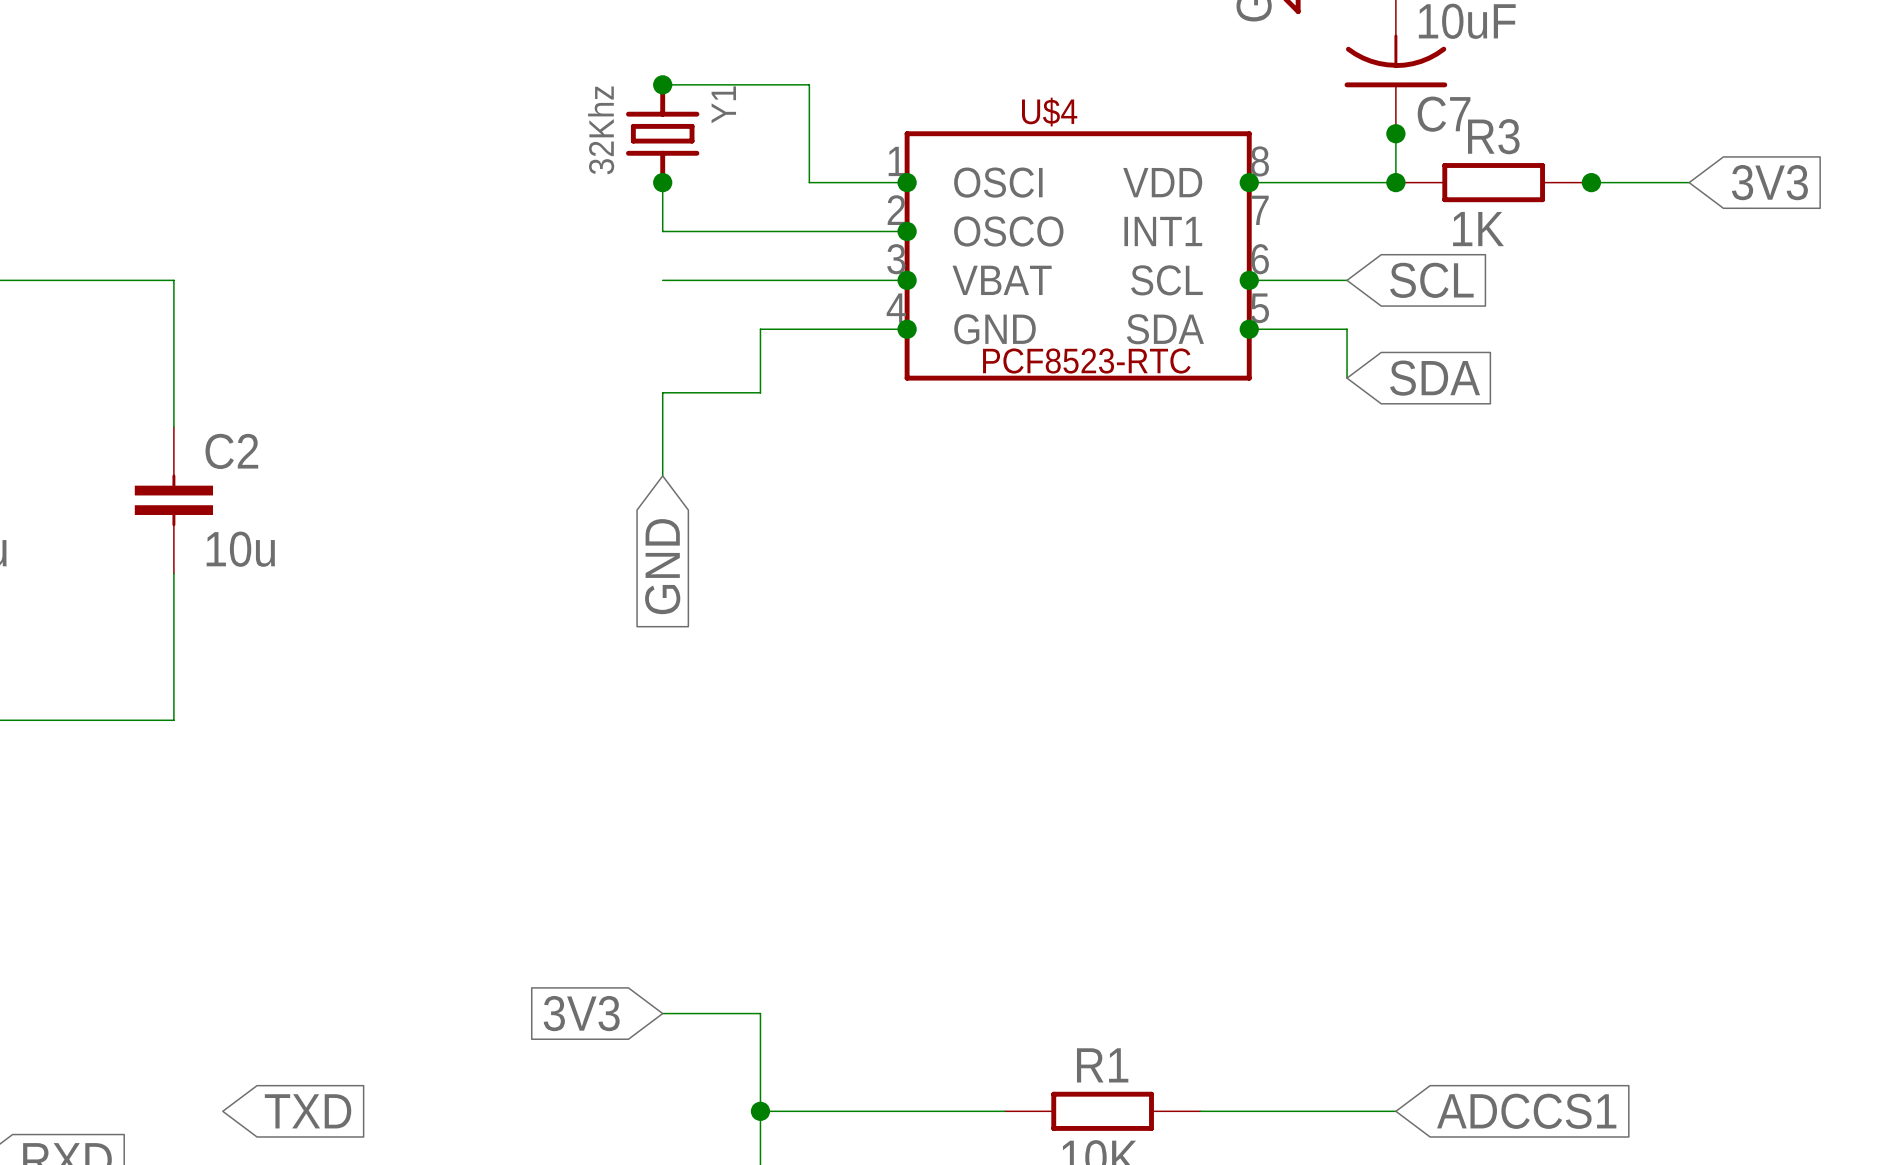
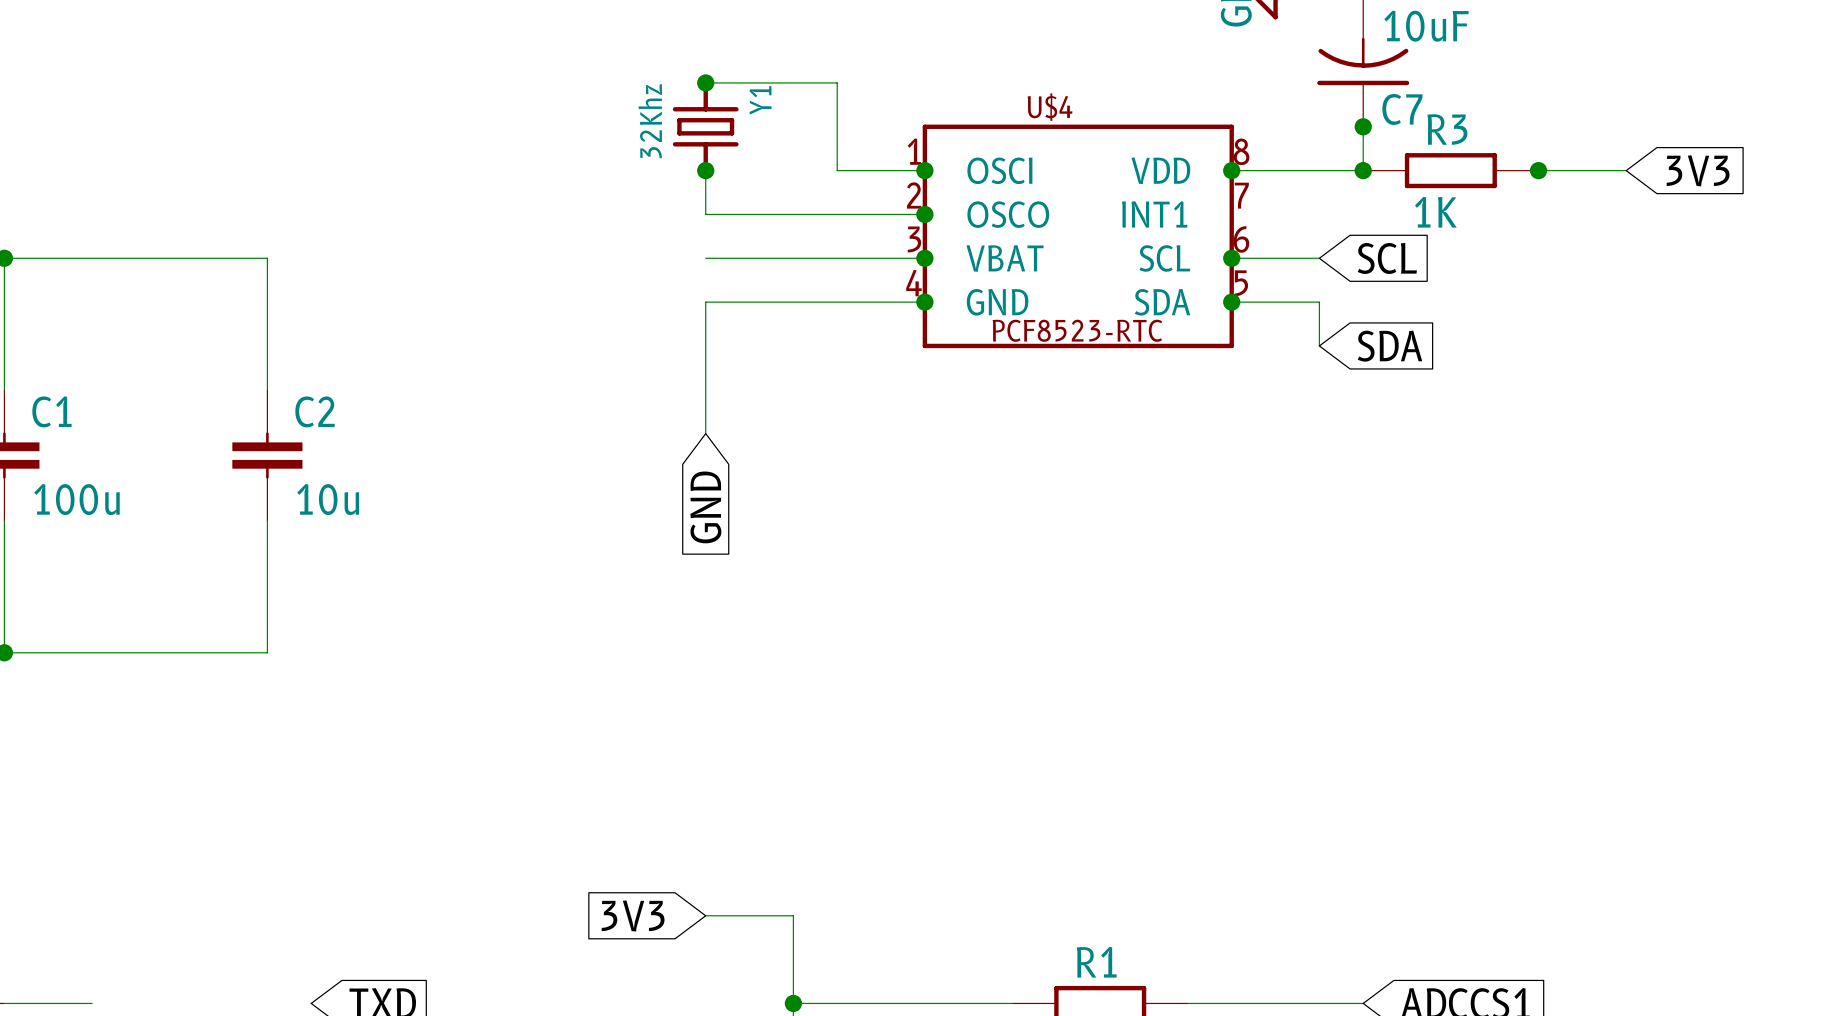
wire: (760, 329) (760, 392) (662, 392) -> (793, 302) (705, 302) (705, 359)

